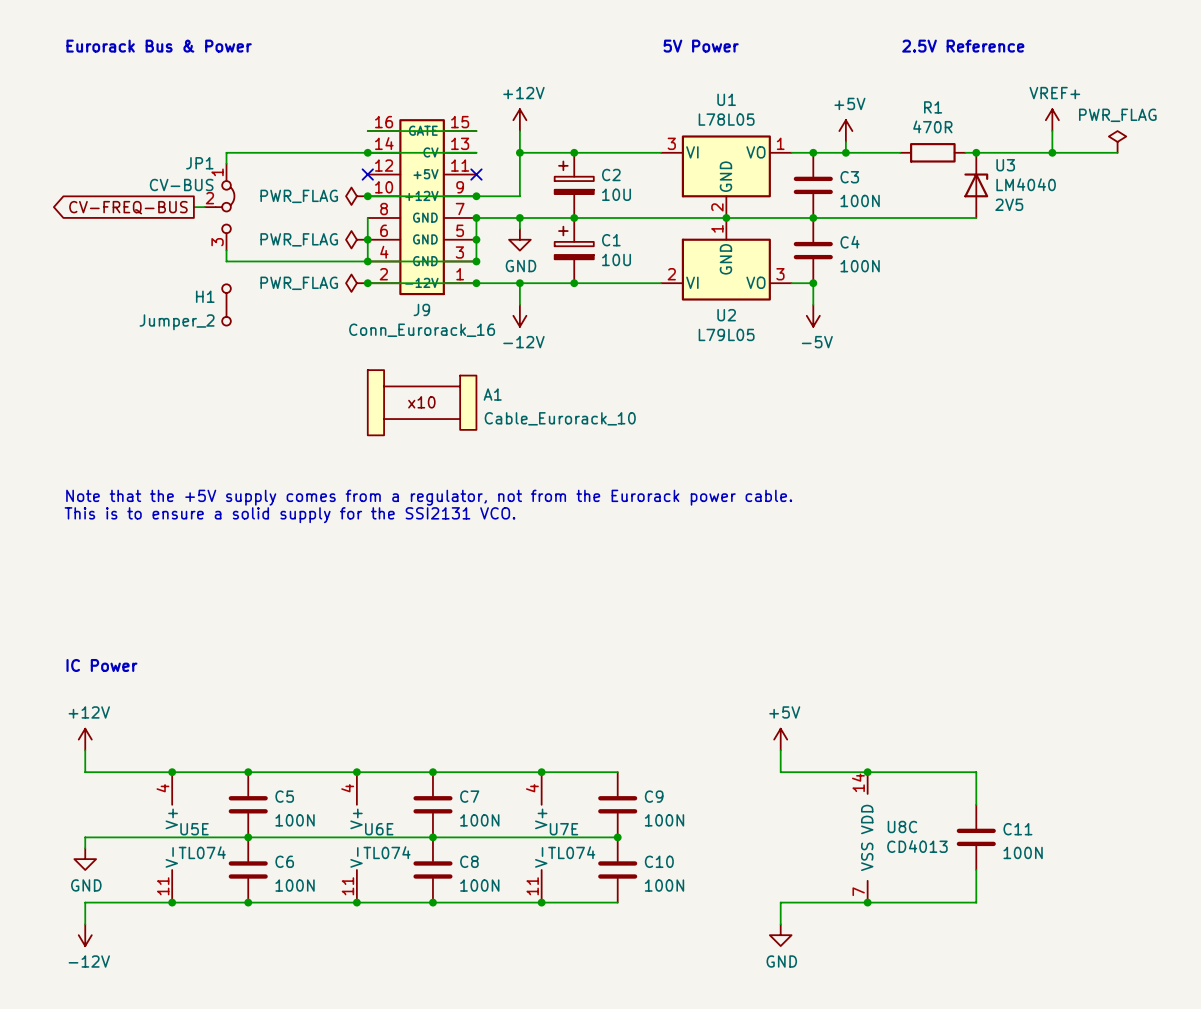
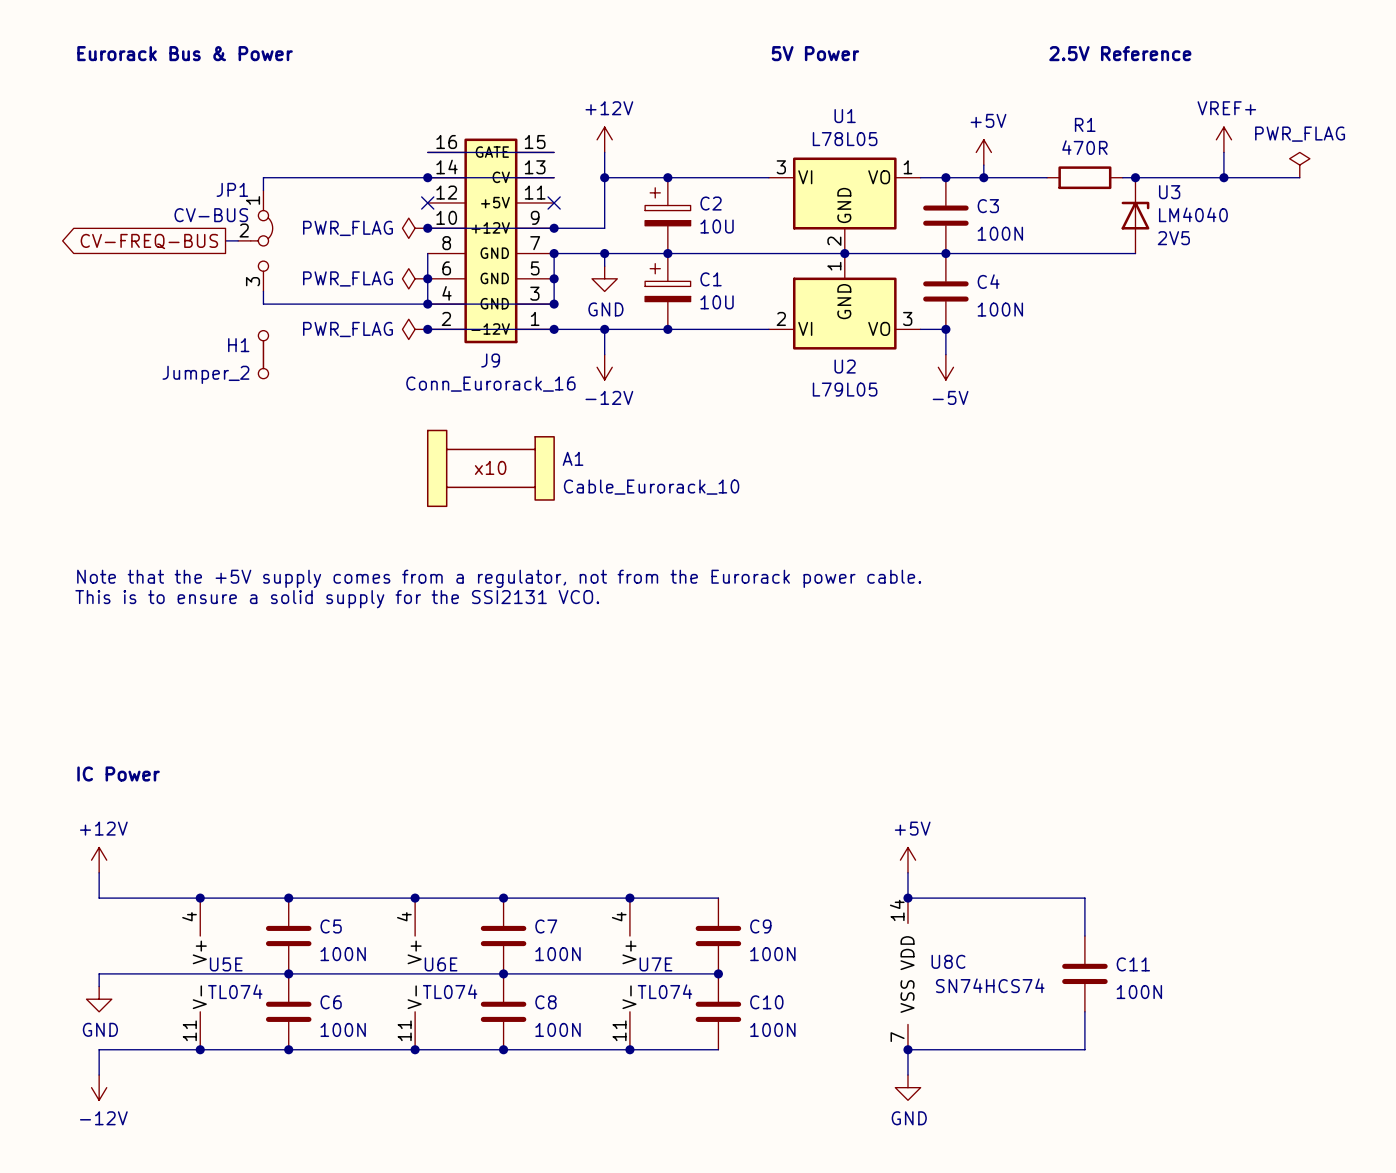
junction: none -> (907, 898)
junction: (867, 772) -> none
wire: (932, 772) (976, 772) (976, 804) -> (1084, 898) (1084, 936)
U8C position: (867, 837) -> (907, 973)
C11 position: (976, 837) -> (1084, 973)
U8C value: CD4013 (917, 846) -> SN74HCS74 (990, 985)
wire: (976, 869) (976, 902) (932, 902) -> (1084, 1011) (1084, 1049)
junction: none -> (907, 1049)
junction: (867, 902) -> none

